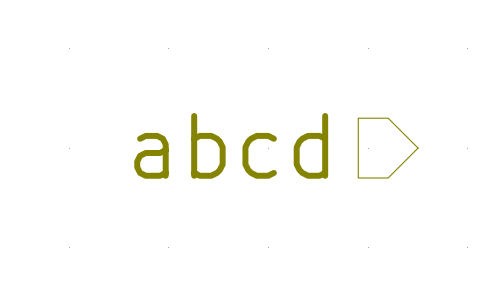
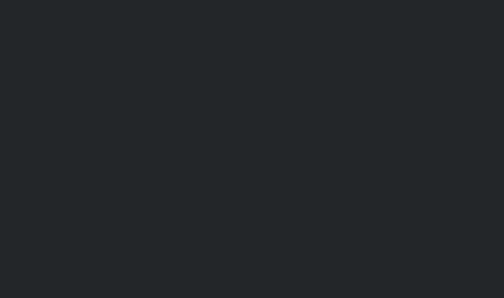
hierarchical label: abcd (231, 145) -> none

